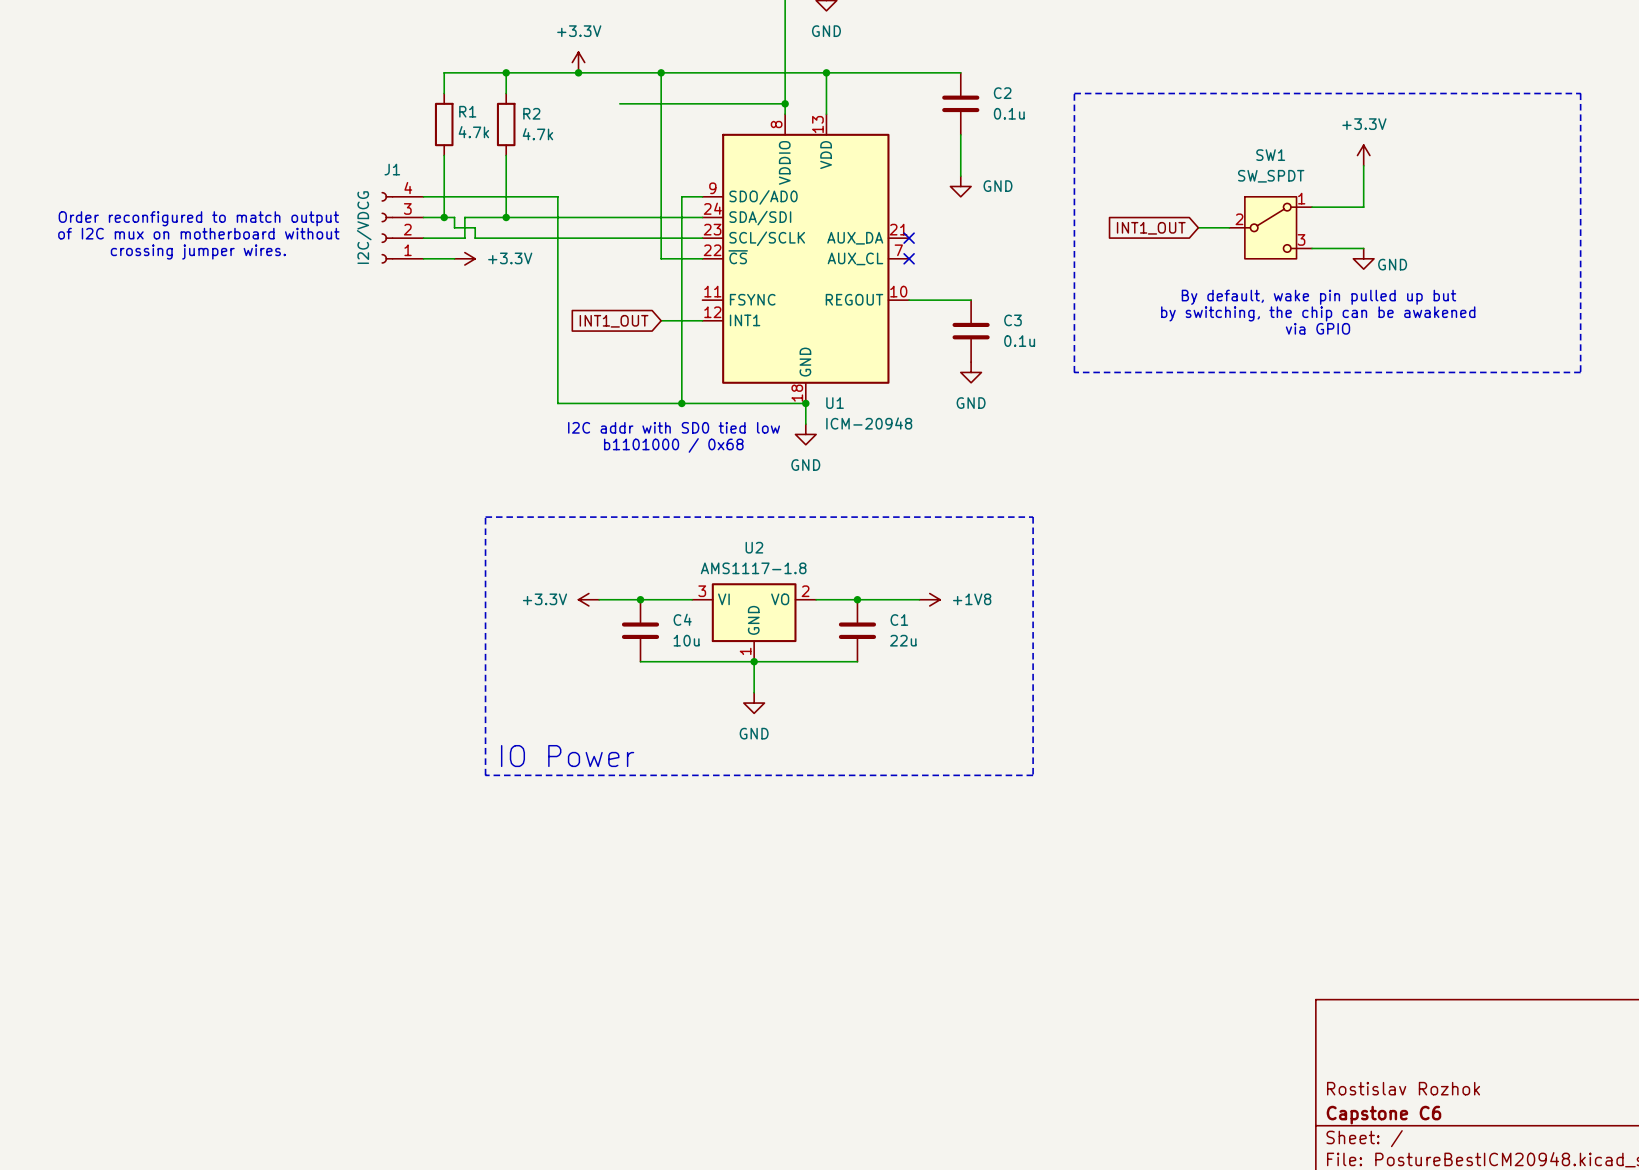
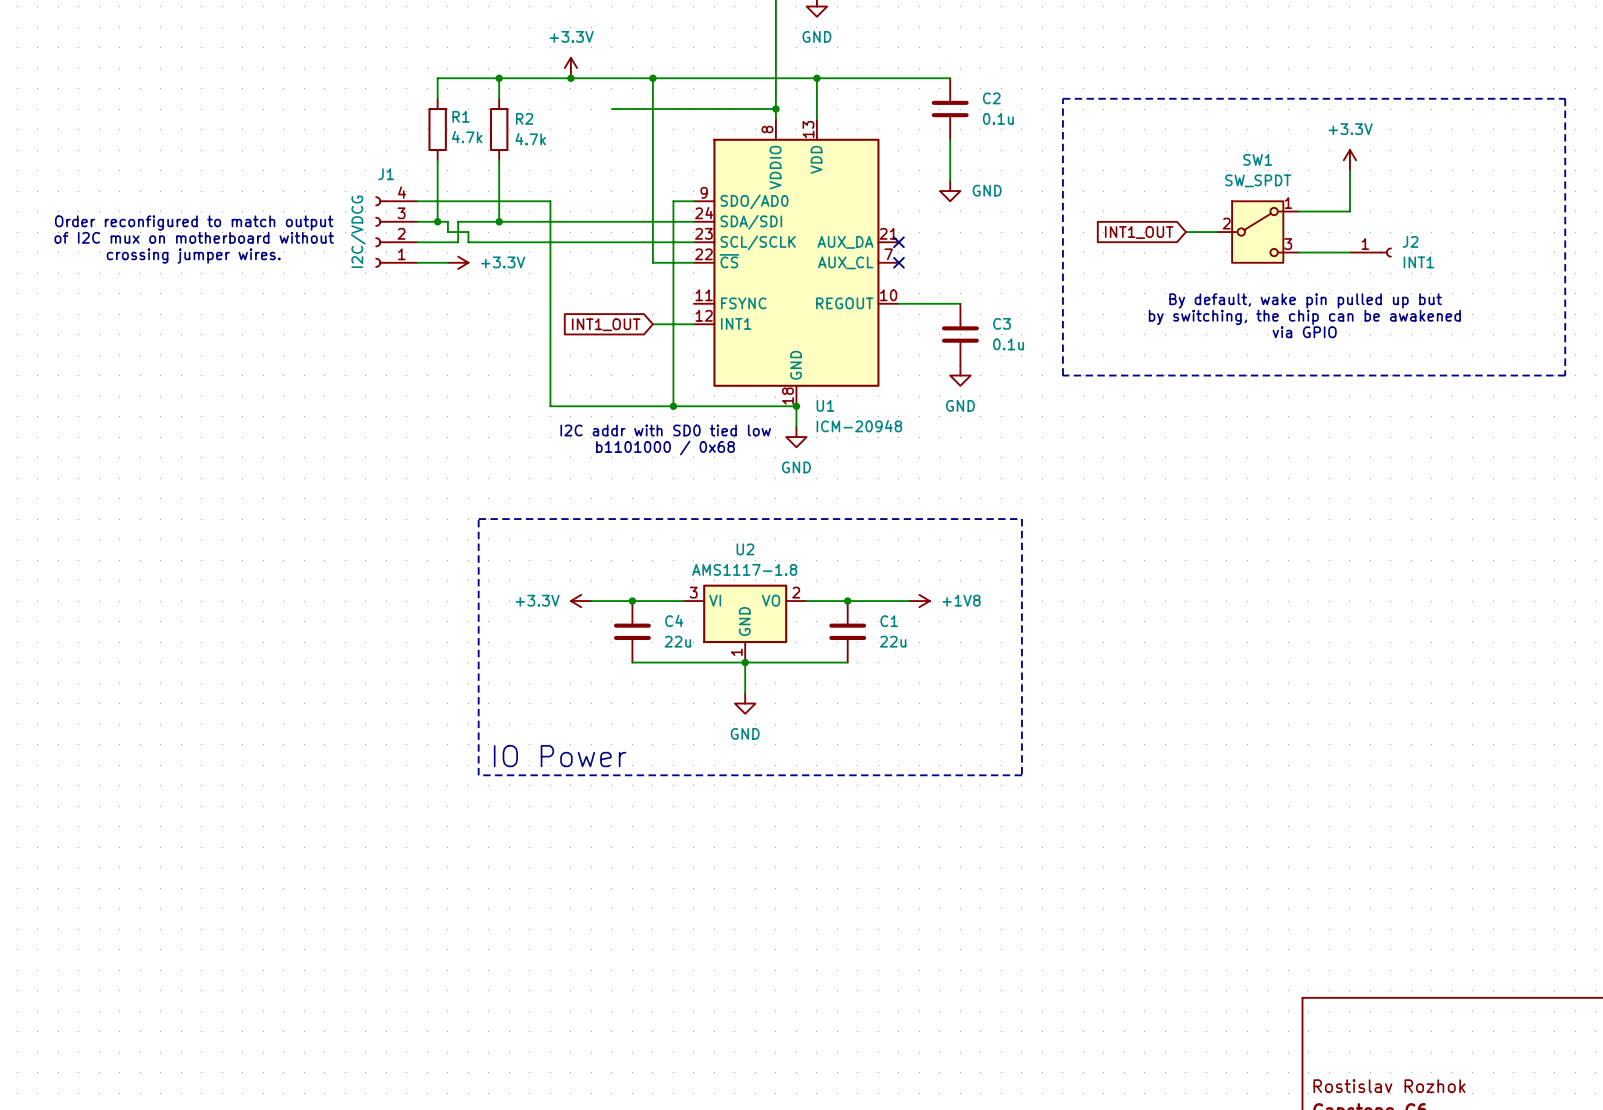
J2: none -> INT1 (1370, 252)
power symbol: GND (1363, 258) -> none
C4 value: 10u (686, 640) -> 22u (677, 641)

